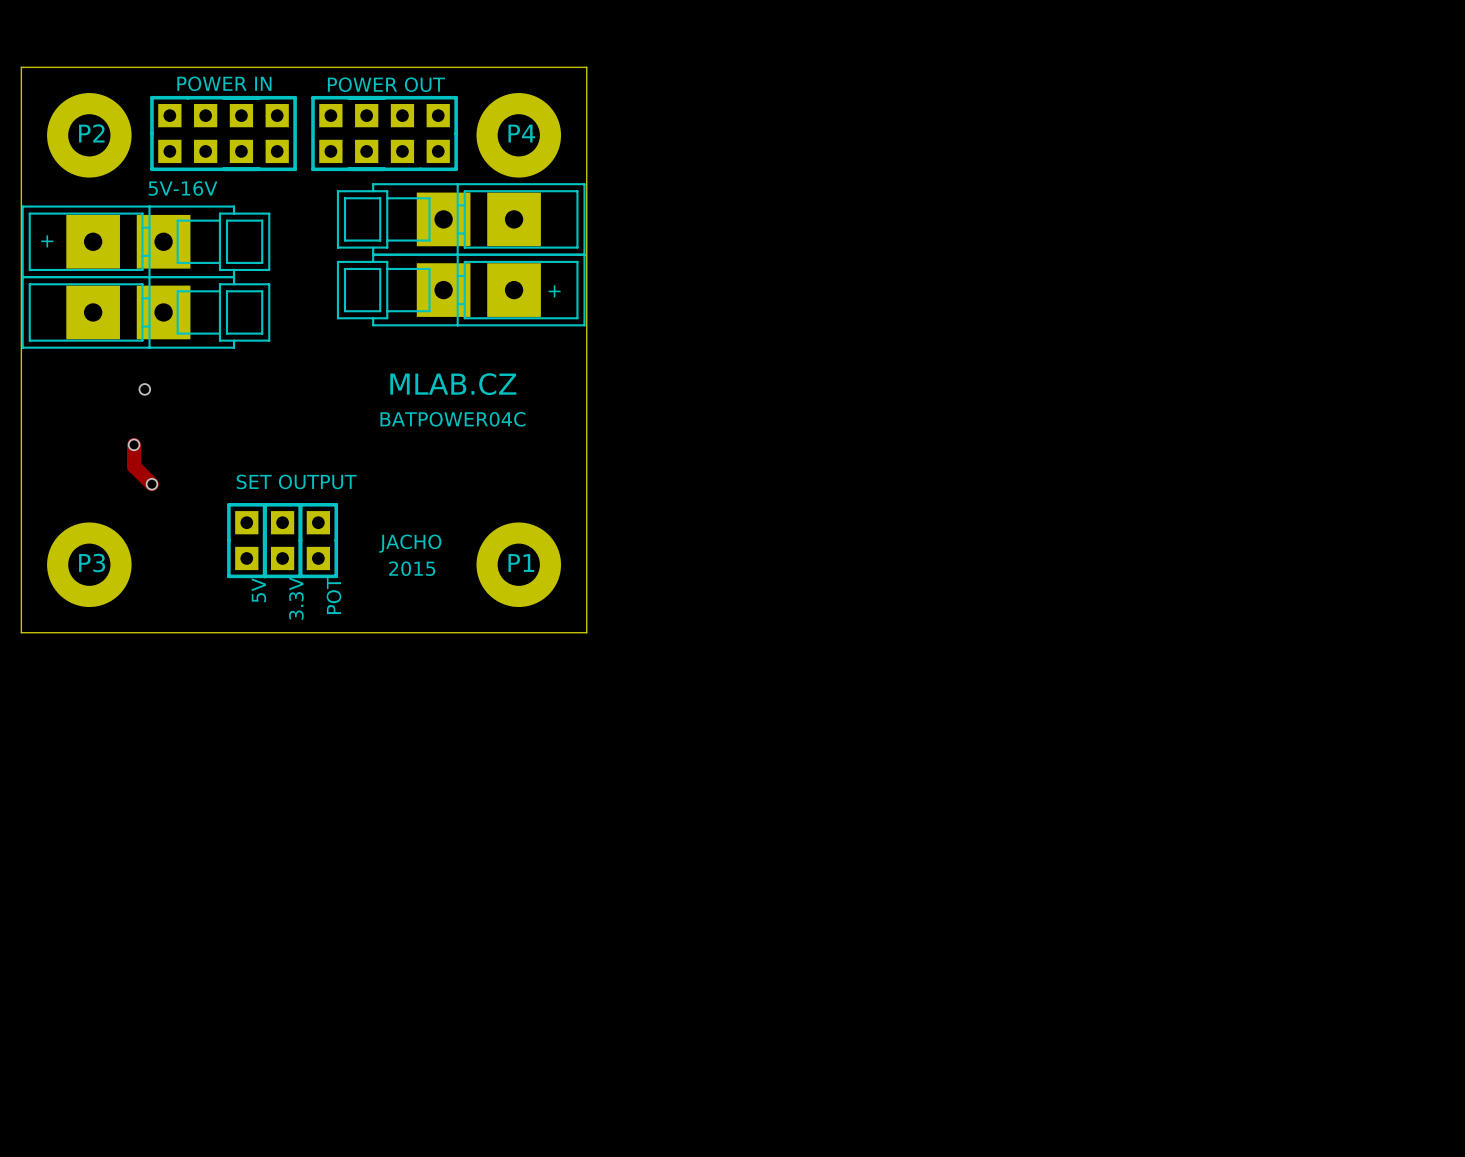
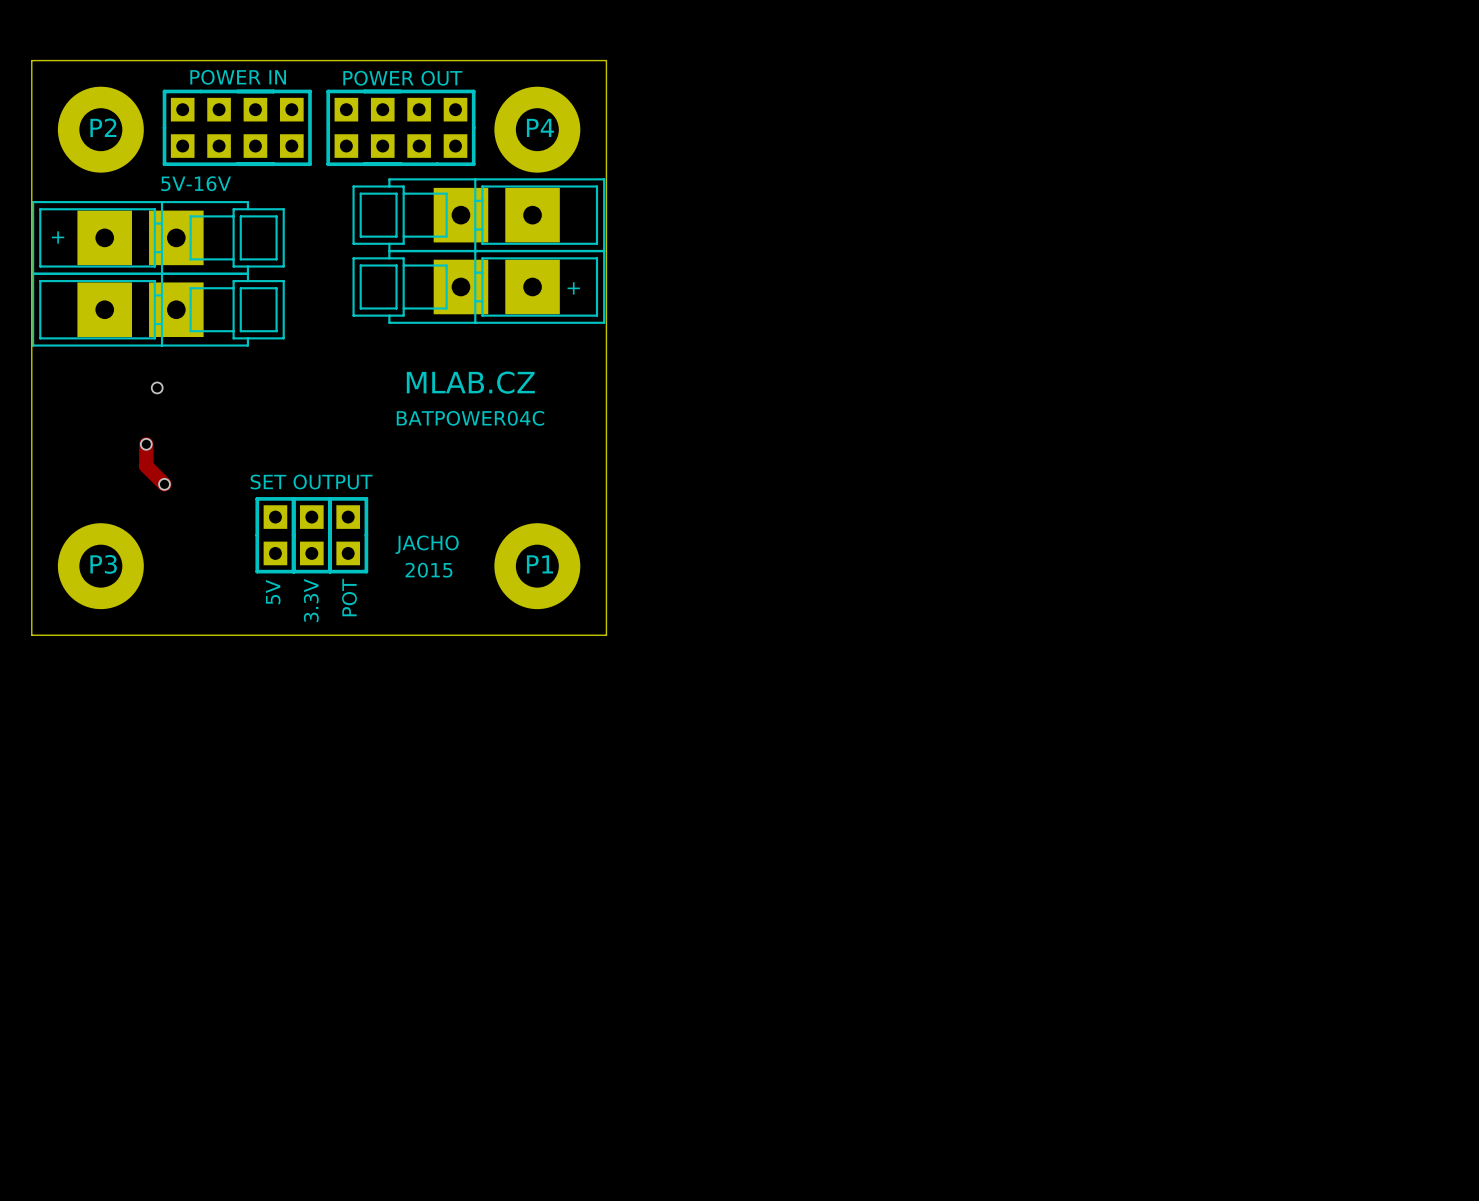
part: none -> (275, 535)
part: none -> (311, 535)
part: none -> (348, 535)
part: (246, 540) -> none
part: (282, 540) -> none
part: (318, 540) -> none

